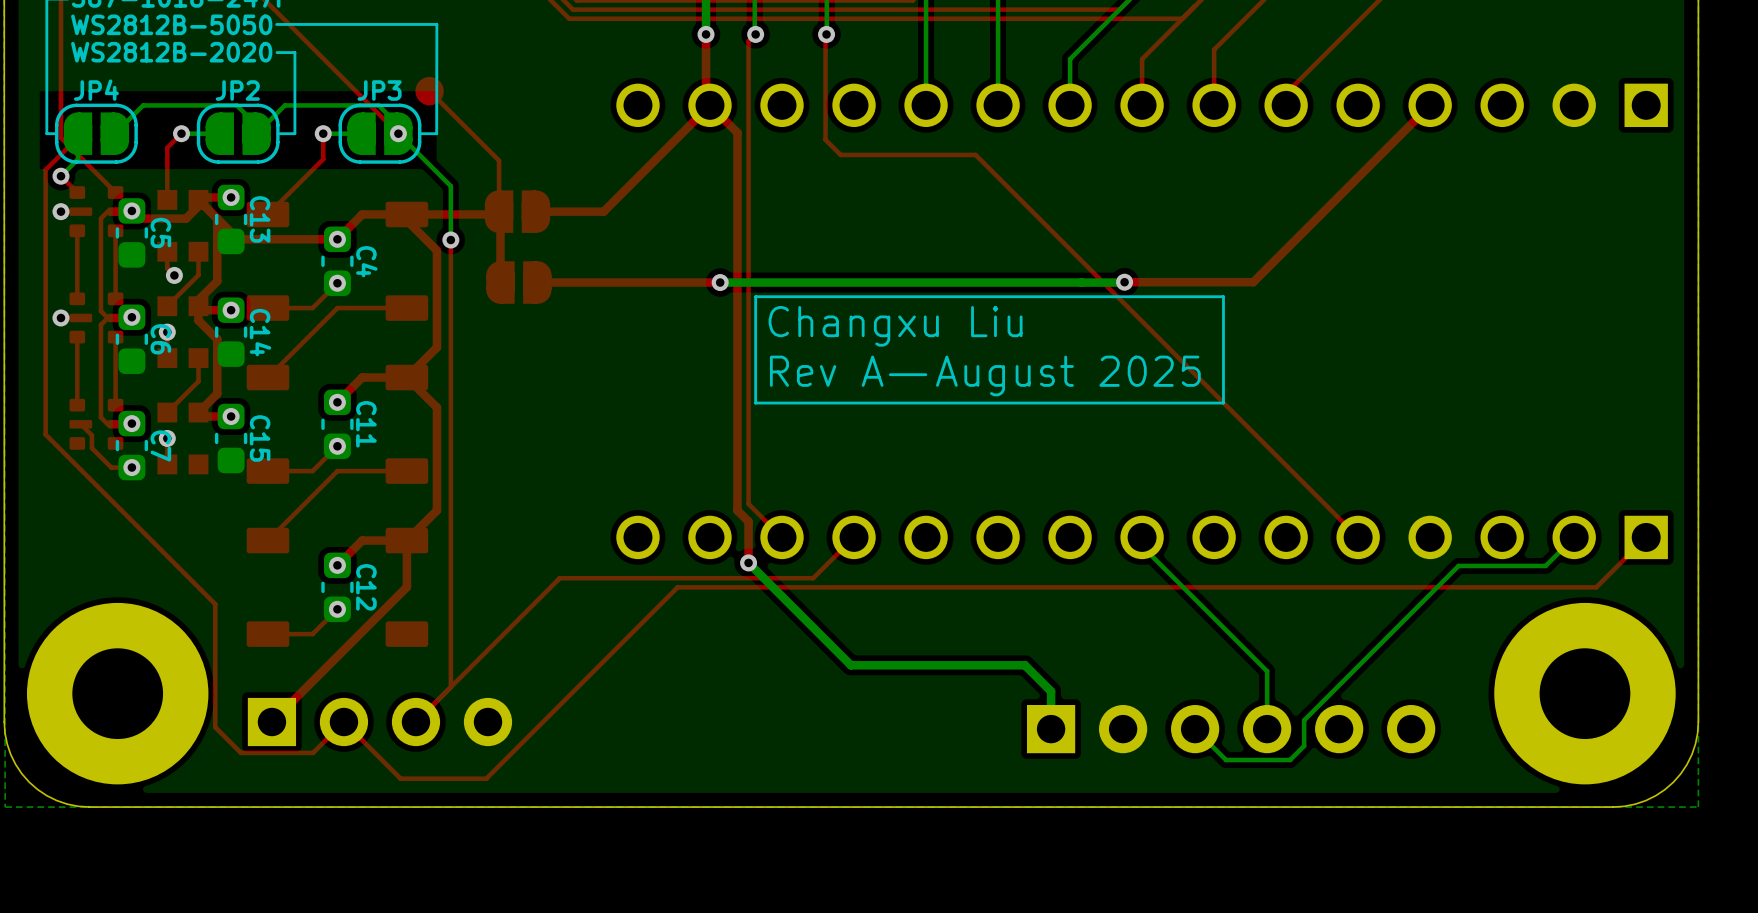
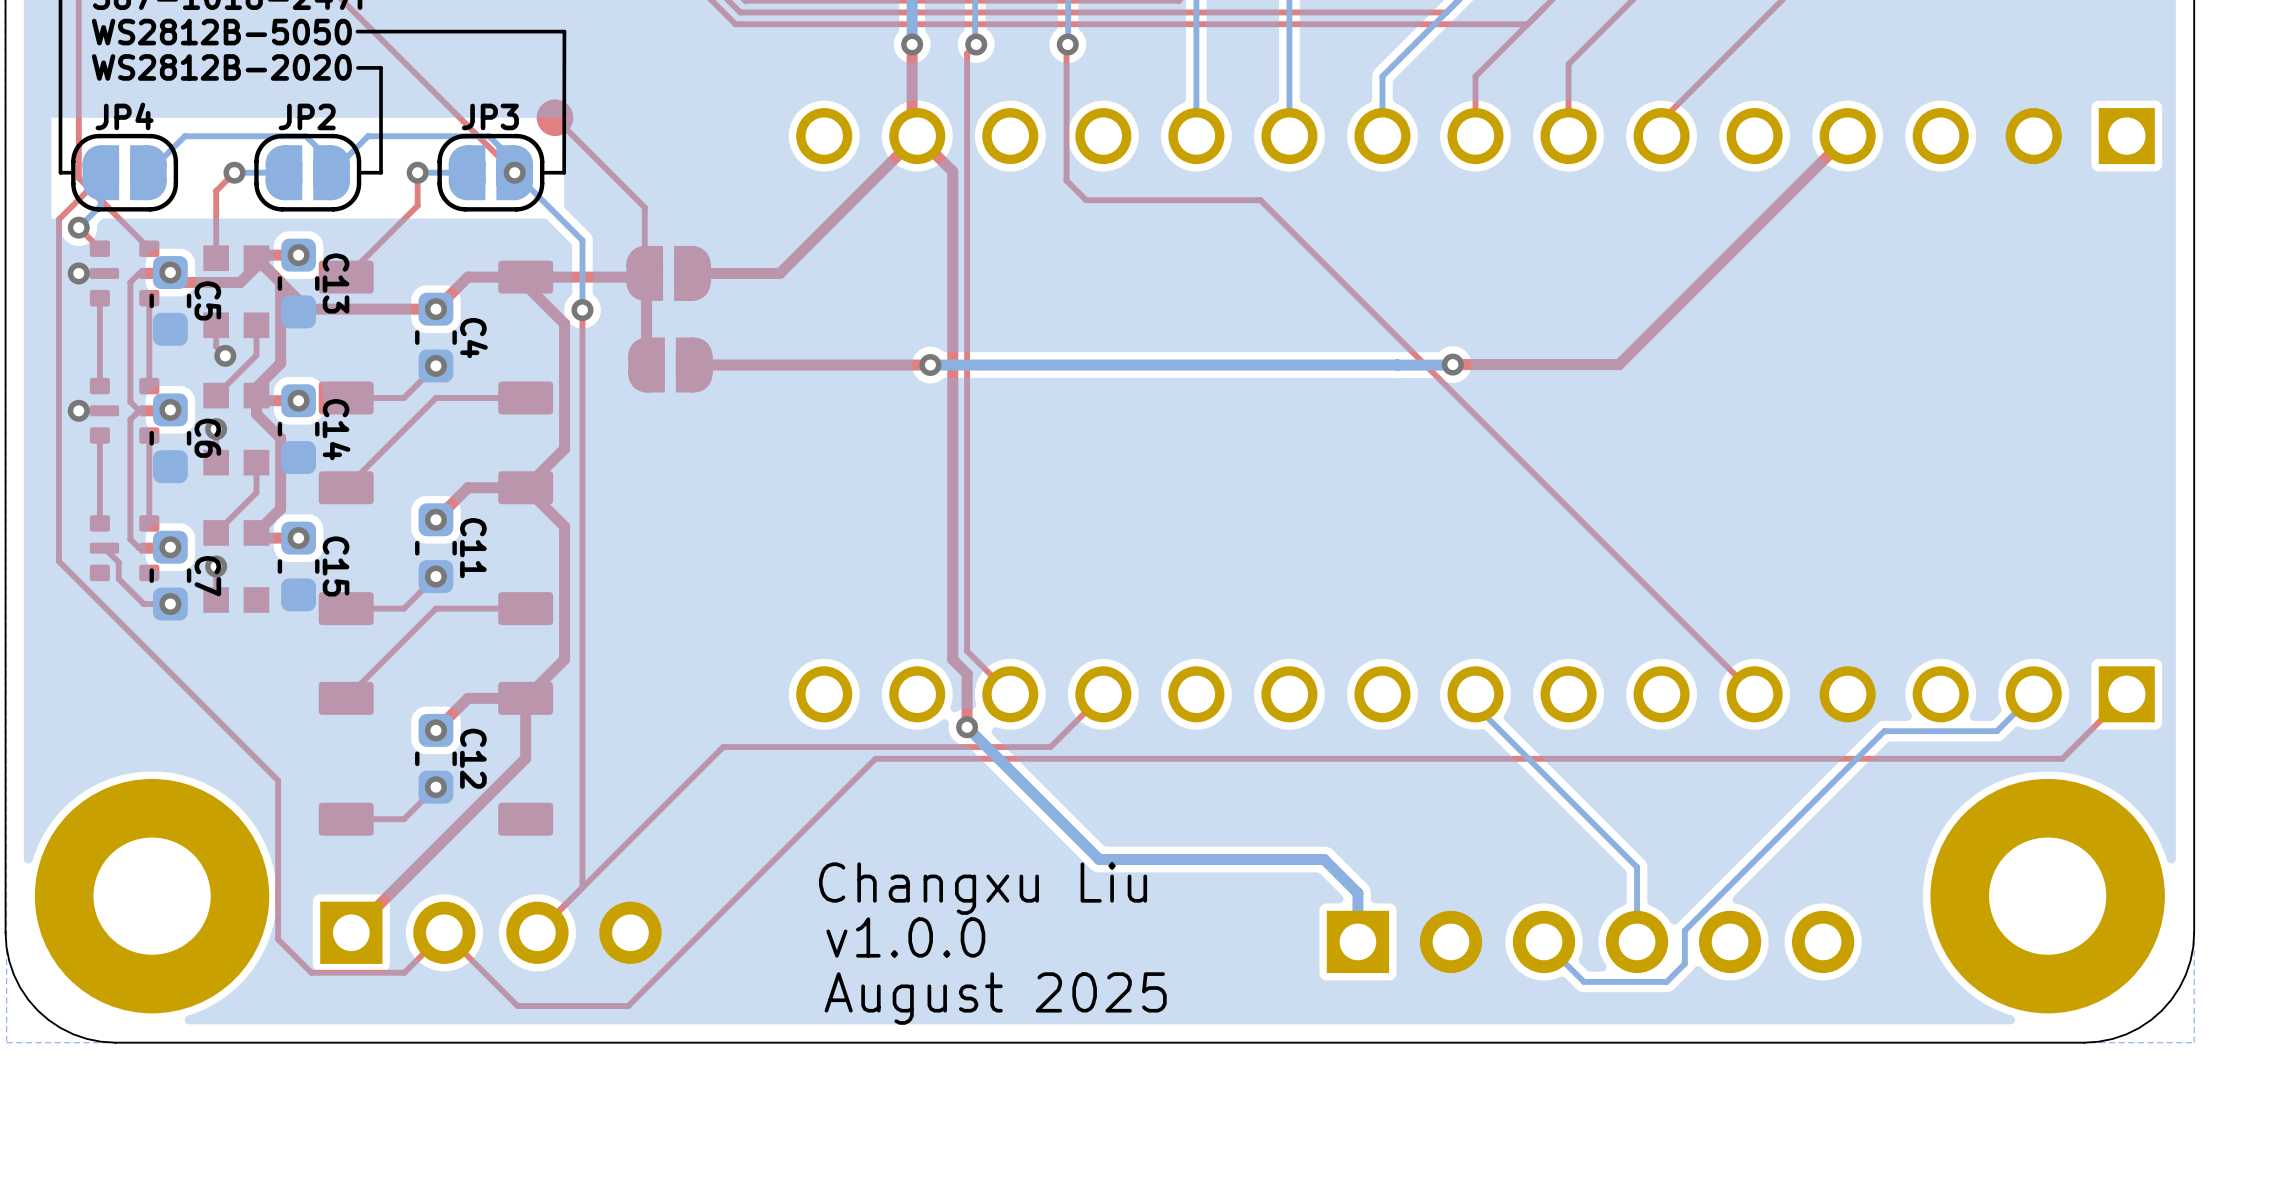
line: (1223, 296) (755, 296) (755, 403) (1223, 403) (1223, 296) -> none
text position: Changxu Liu (895, 326) -> Changxu Liu (983, 888)
text: Rev A (826, 371) -> none
line: (925, 374) (890, 374) -> none
text position: August 2025 (1068, 375) -> August 2025 (995, 998)
text: none -> v1.0.0 (905, 937)

